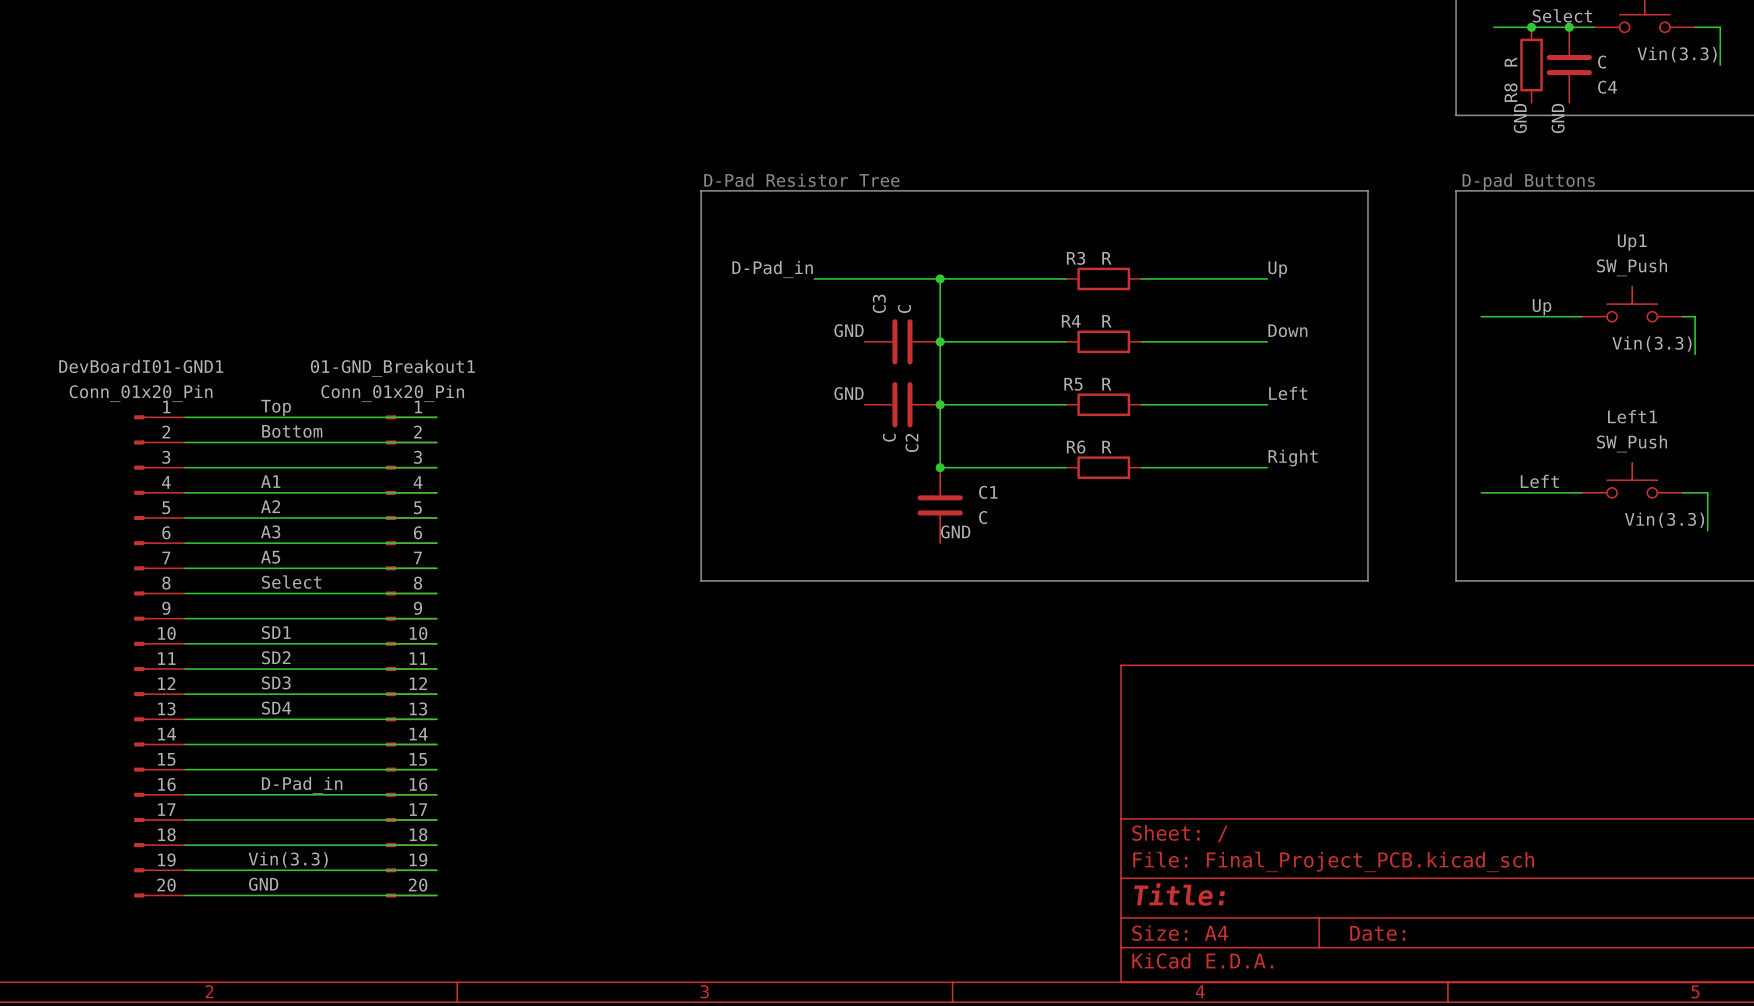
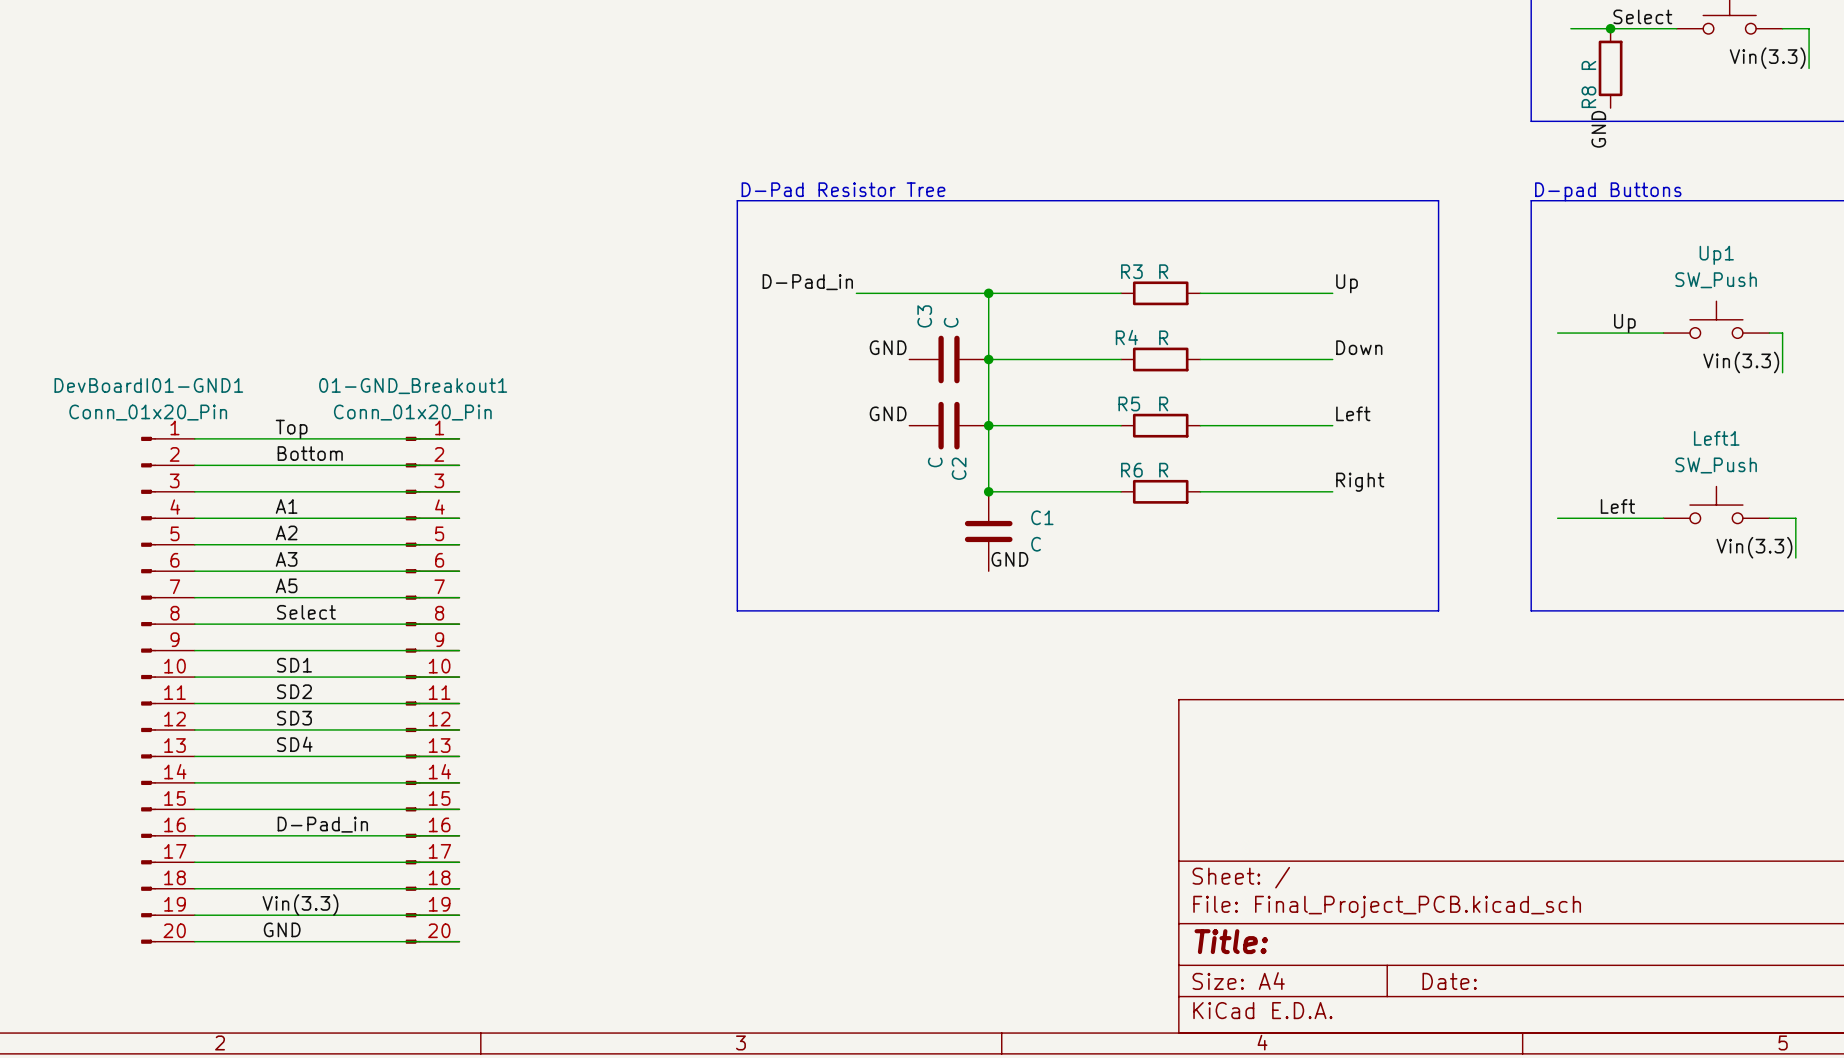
junction: (1569, 27) -> none
C4: C (1569, 65) -> none
label: GND (1558, 118) -> none

